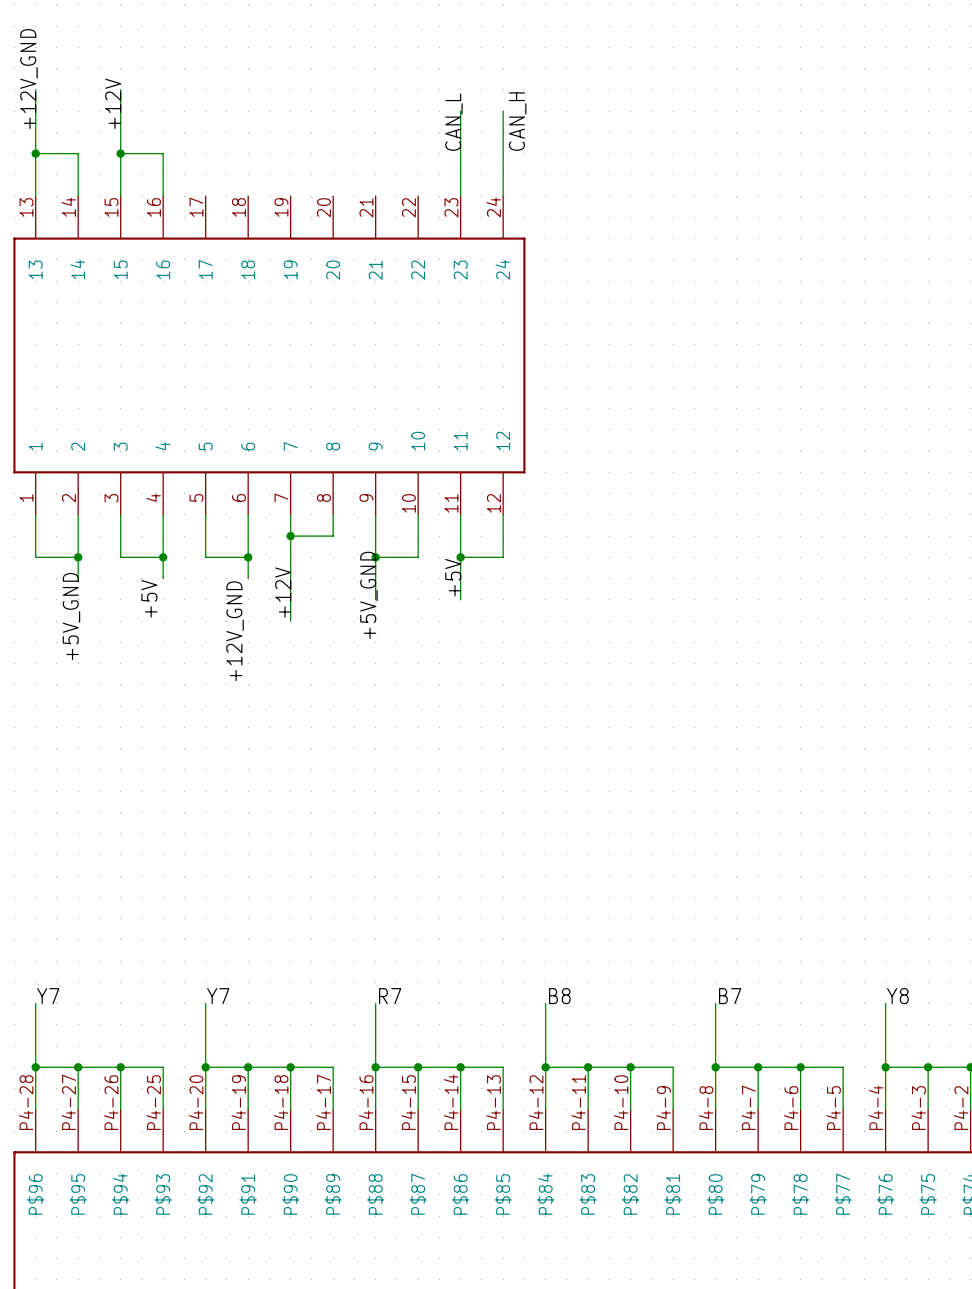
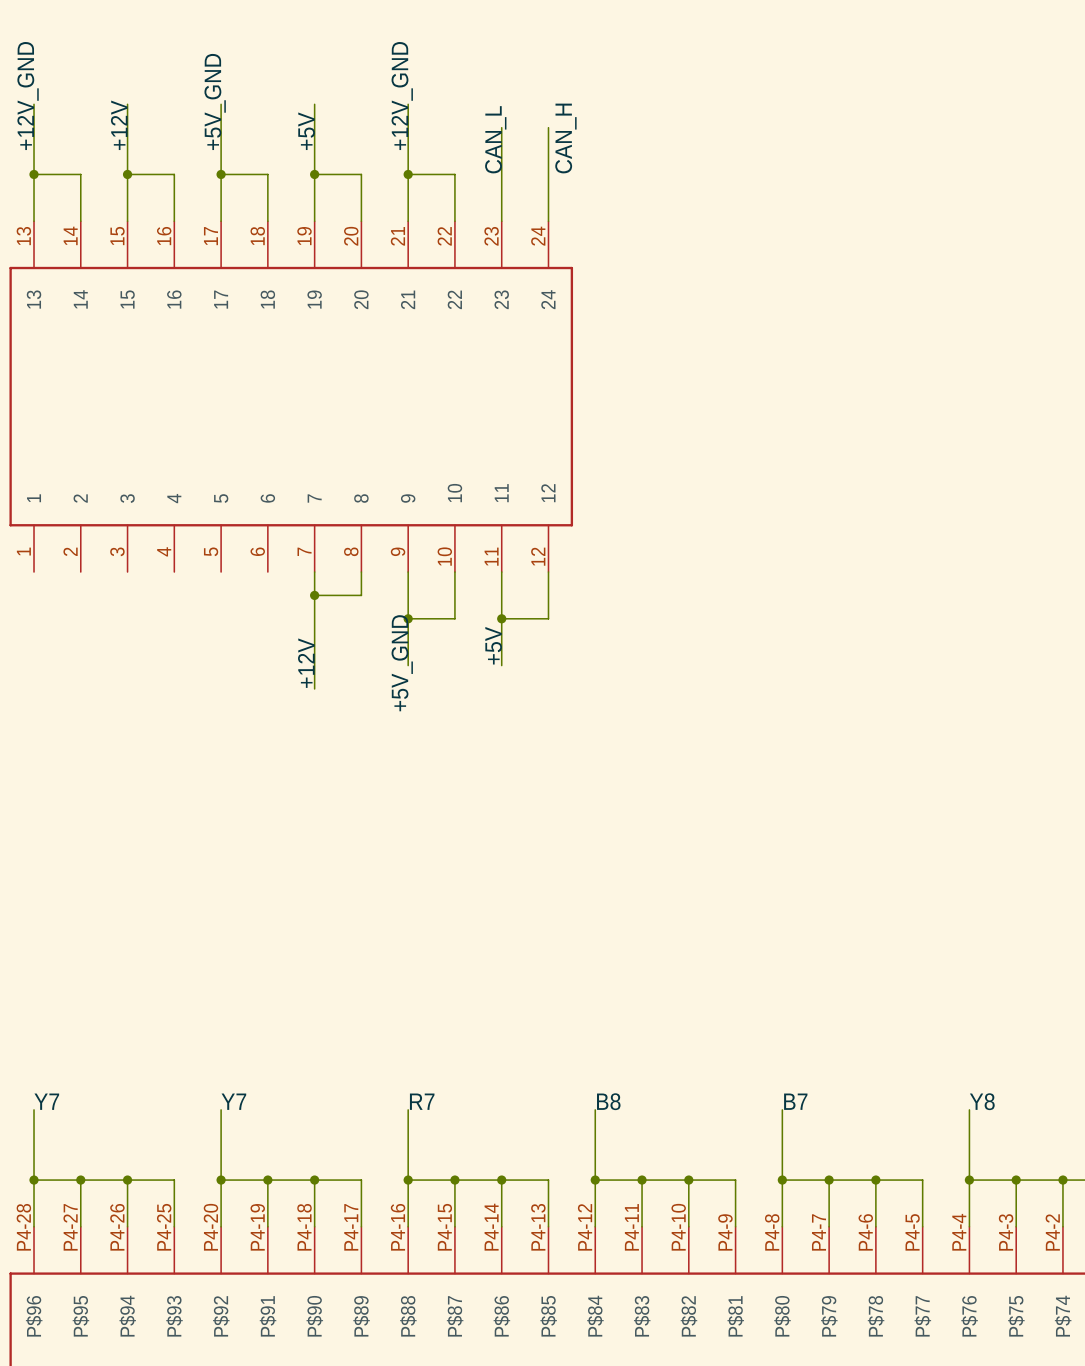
label: none -> +12V_GND (402, 96)
label: none -> +5V_GND (215, 101)
wire: none -> (221, 104) (221, 221)
wire: none -> (314, 104) (314, 221)
wire: none -> (408, 104) (408, 221)
label: none -> +5V (306, 131)
wire: none -> (221, 174) (267, 174) (267, 221)
junction: none -> (221, 174)
wire: none -> (314, 174) (361, 174) (361, 221)
junction: none -> (314, 174)
wire: none -> (408, 174) (454, 174) (454, 221)
junction: none -> (408, 174)
wire: (35, 514) (35, 557) (78, 557) -> none
wire: (78, 514) (78, 578) -> none
wire: (120, 514) (120, 557) (163, 557) -> none
wire: (163, 514) (163, 578) -> none
wire: (205, 514) (205, 557) (248, 557) -> none
wire: (248, 514) (248, 578) -> none
junction: (78, 557) -> none
junction: (163, 557) -> none
junction: (248, 557) -> none
label: +5V (149, 598) -> none
label: +5V_GND (71, 616) -> none
label: +12V_GND (235, 631) -> none

